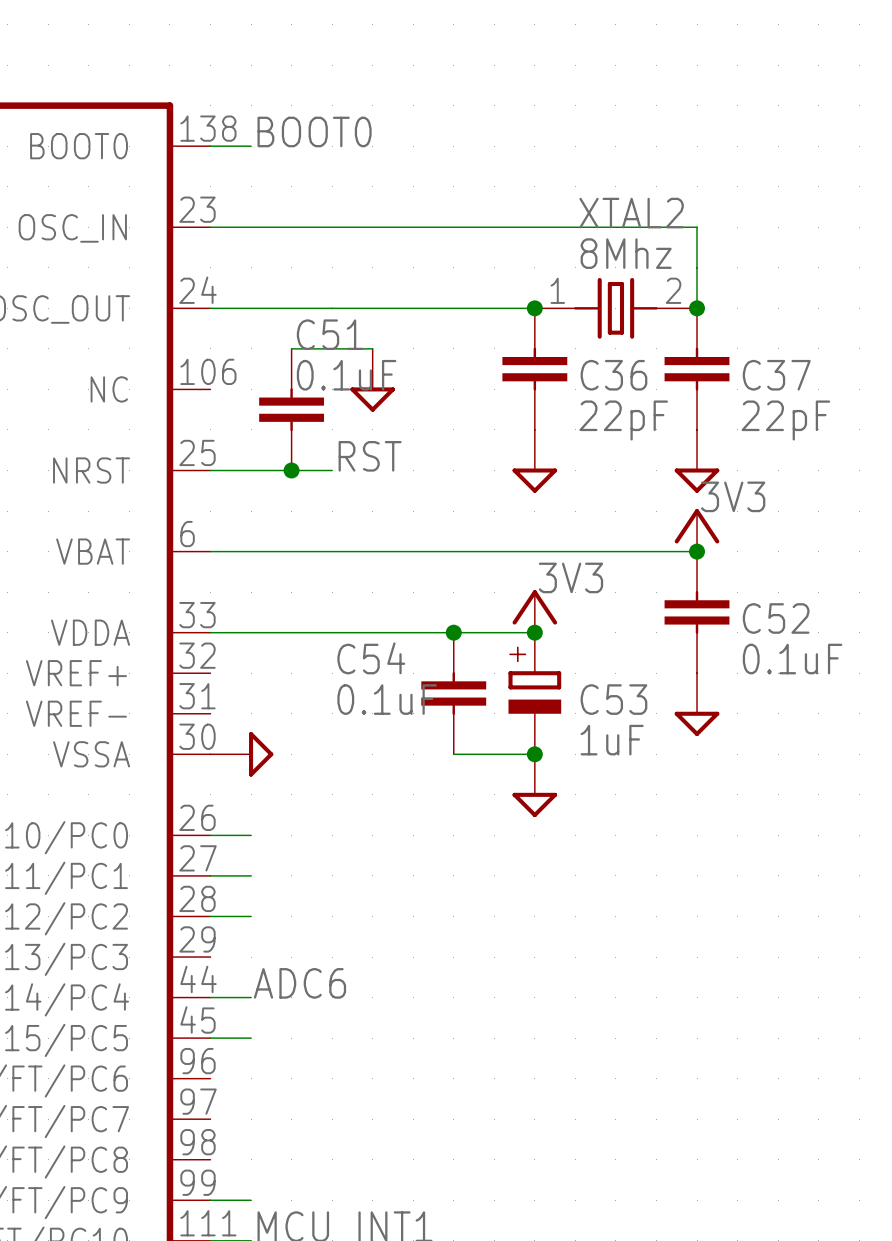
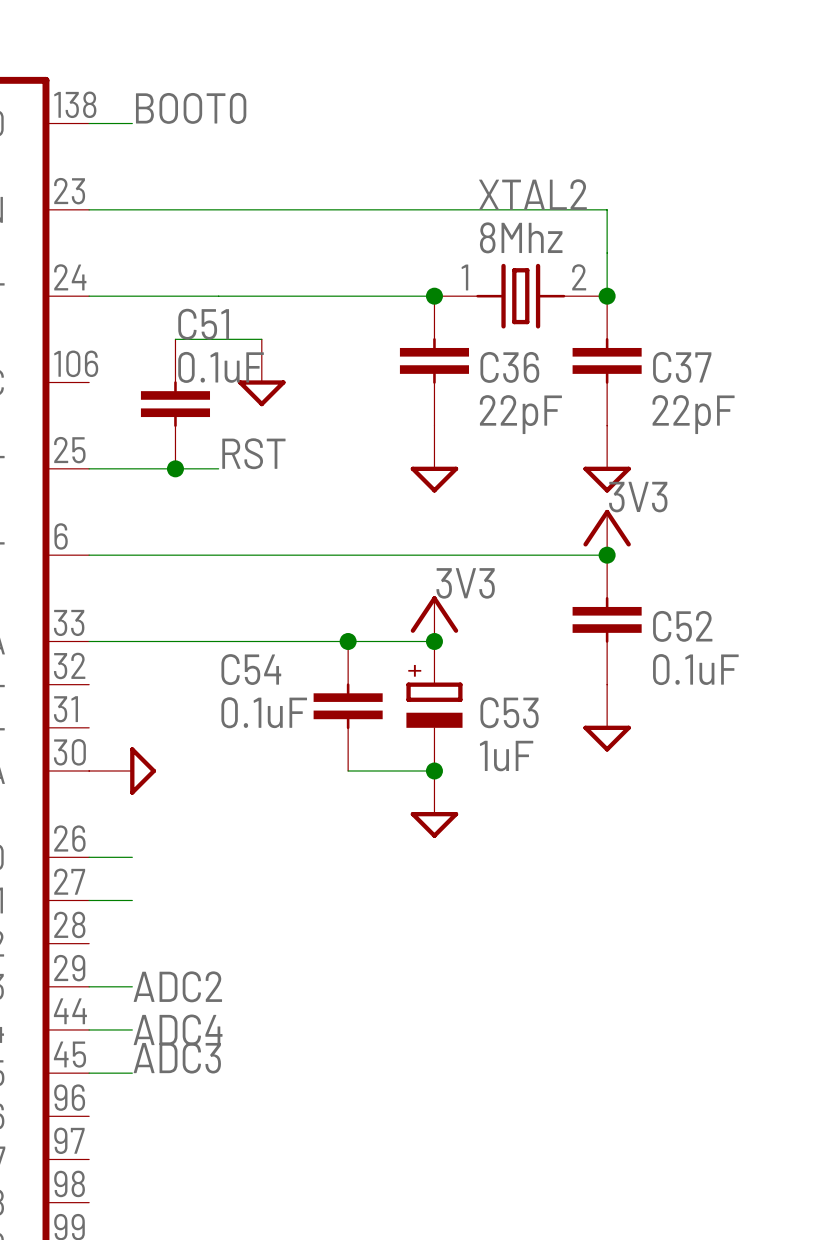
wire: (210, 916) (251, 916) -> (89, 986) (132, 986)
label: none -> ADC2 (177, 986)
label: ADC6 (299, 983) -> ADC4 (178, 1030)
label: none -> ADC3 (177, 1058)

